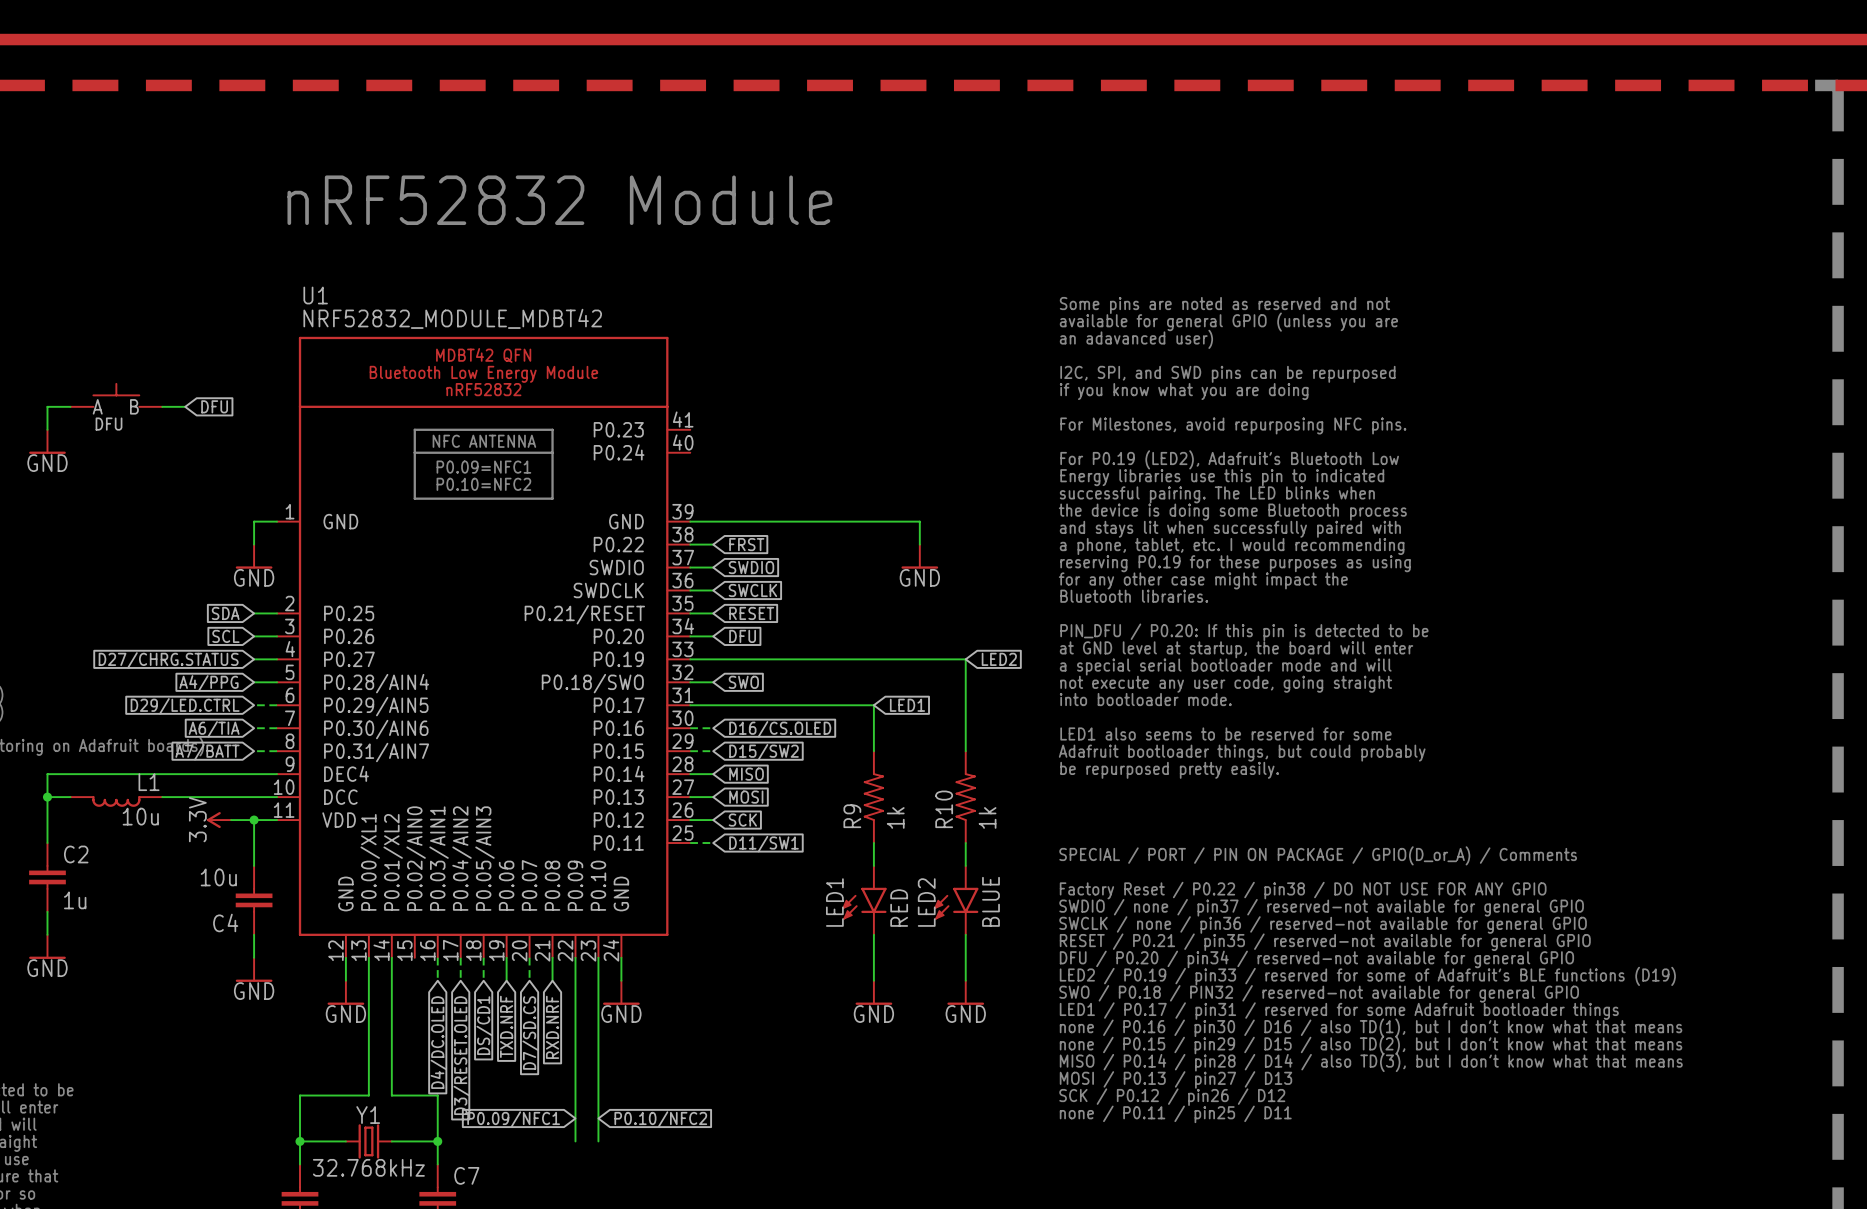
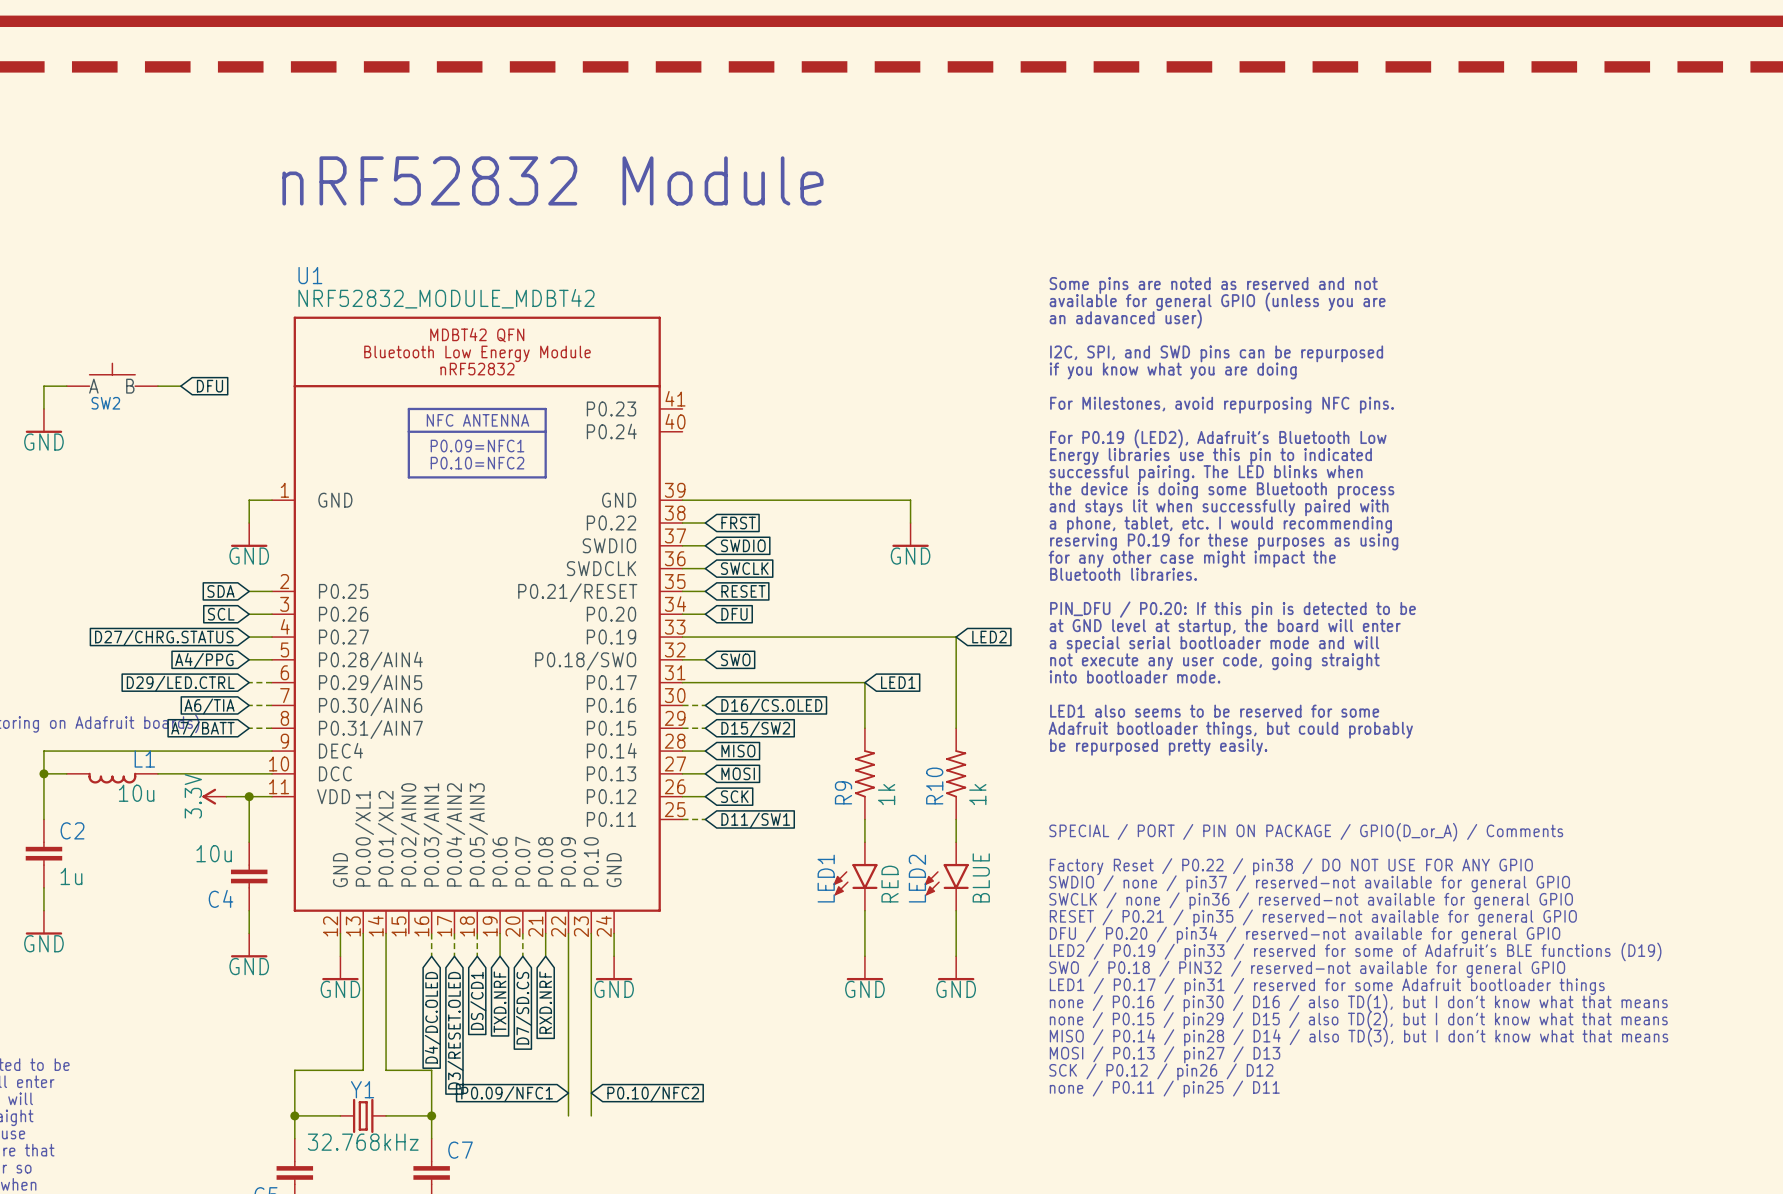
DFU name: DFU (109, 424) -> SW2 (105, 403)

